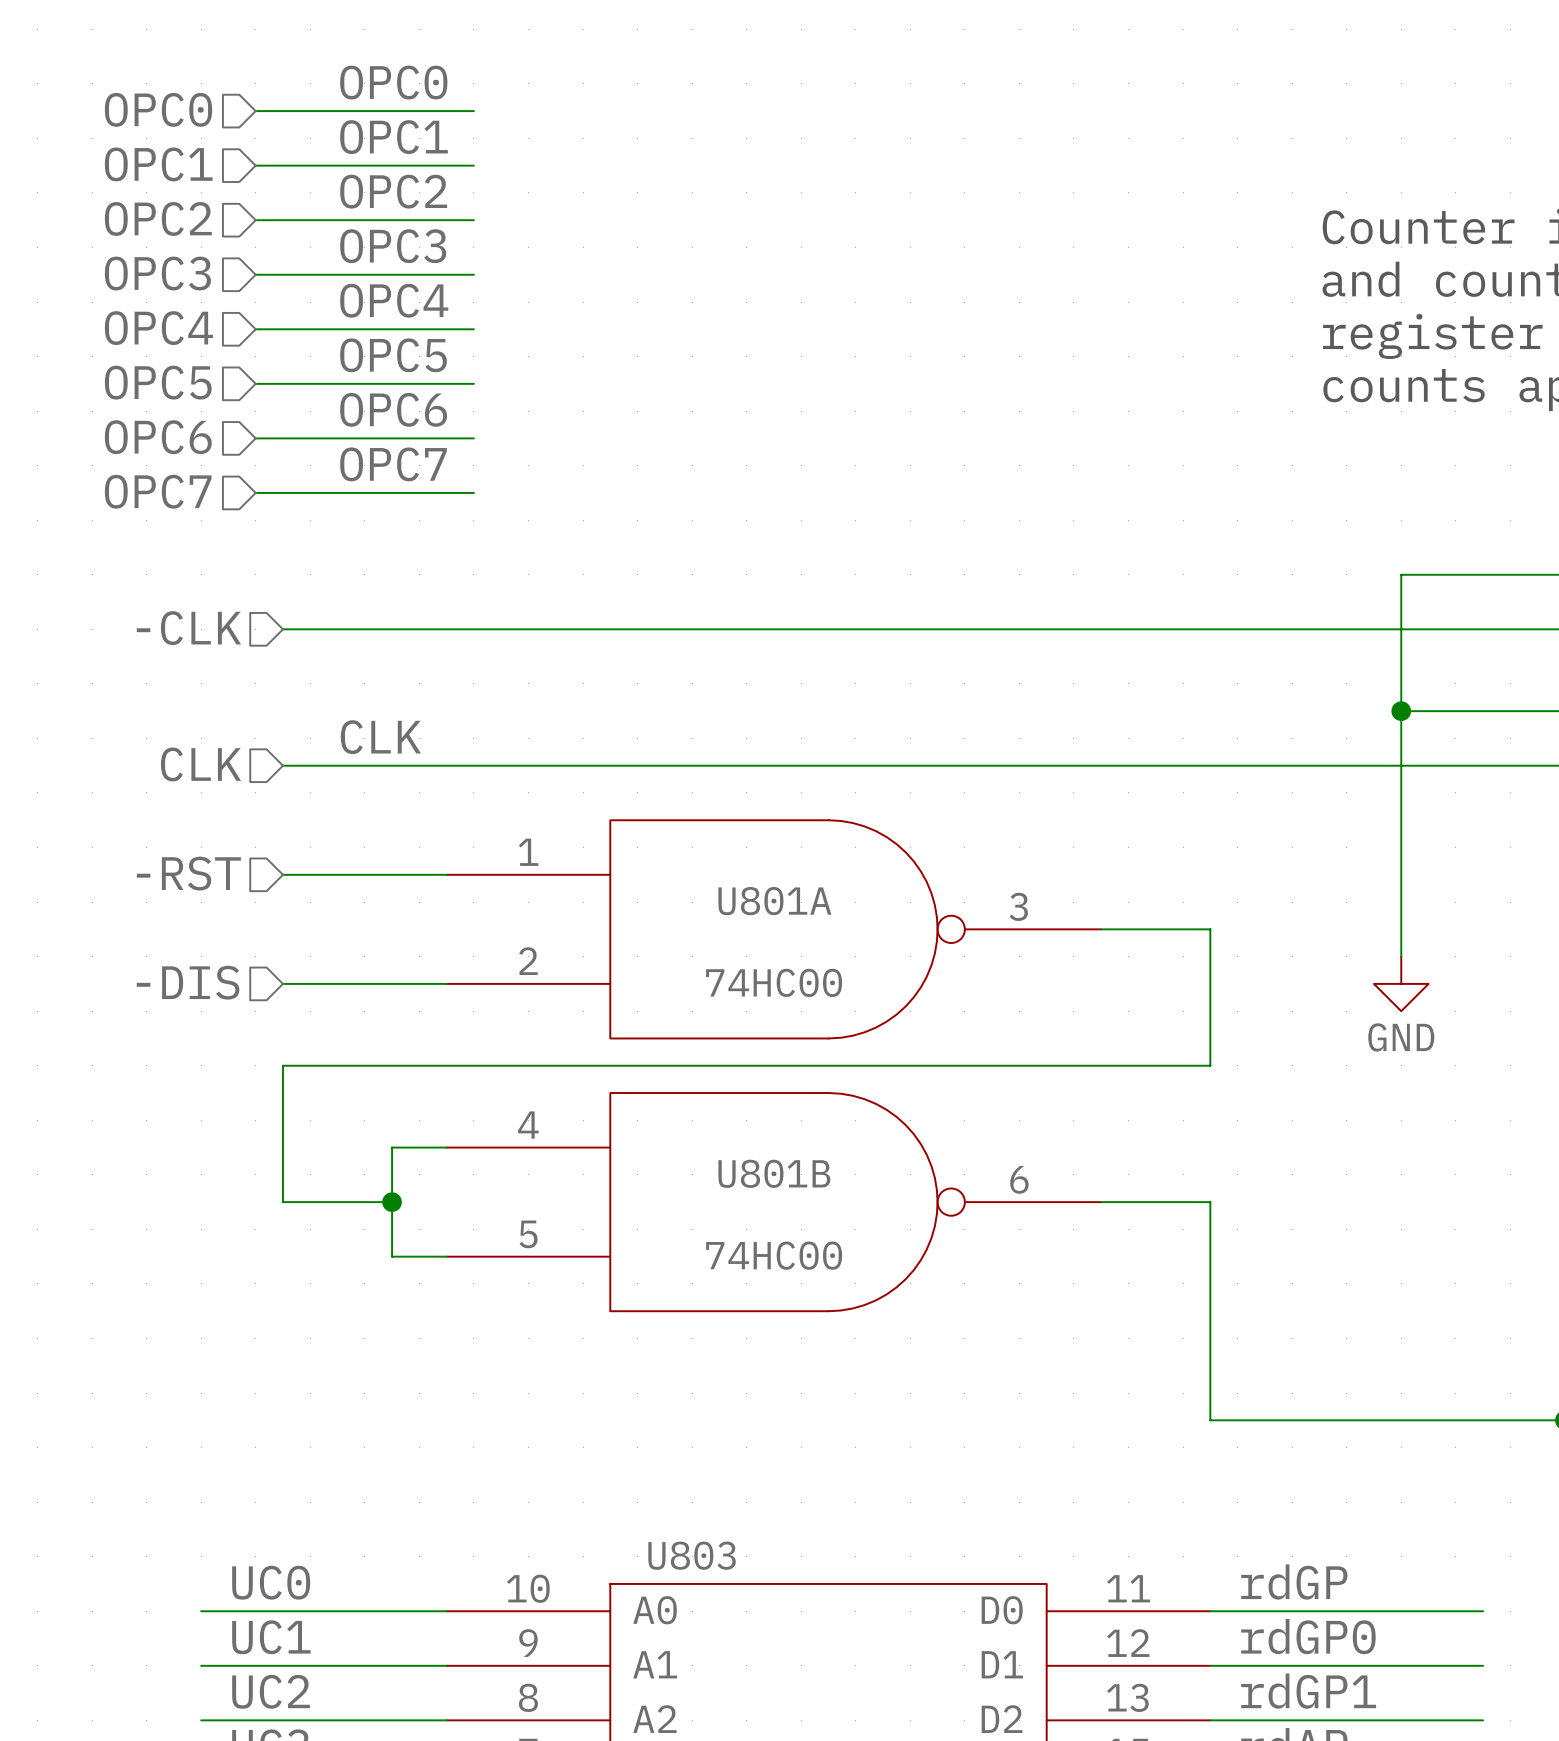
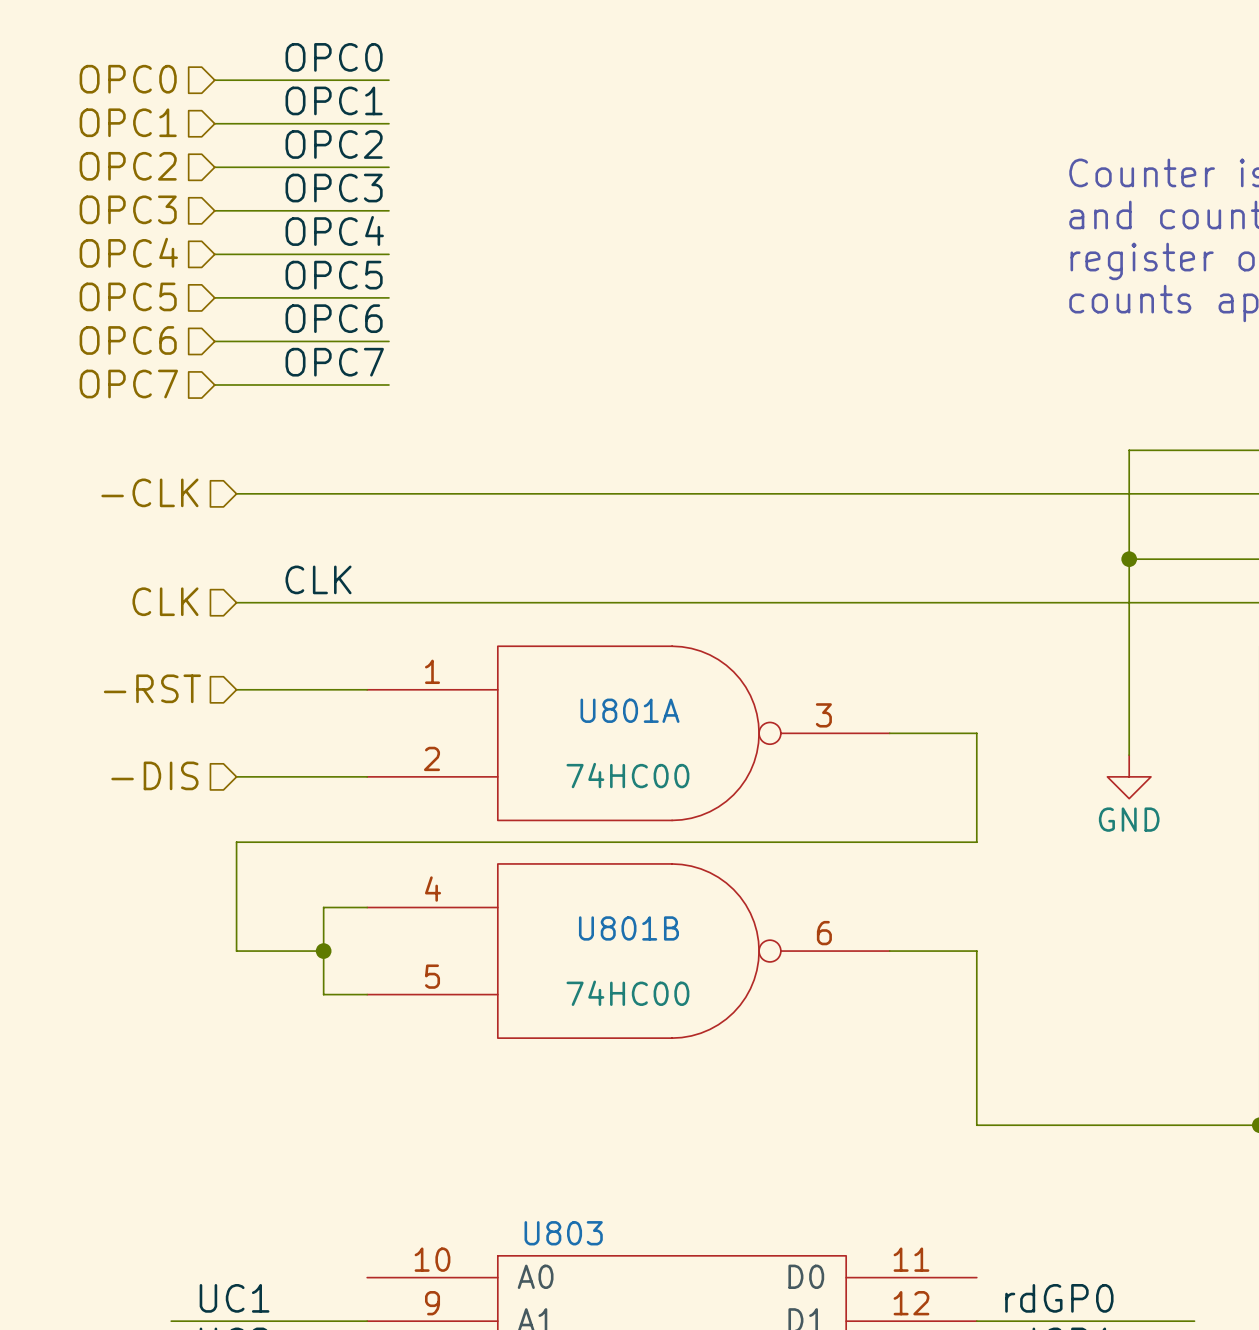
label: UC0 (271, 1582) -> none
label: rdGP (1294, 1582) -> none
wire: (201, 1611) (446, 1611) -> none
wire: (1210, 1611) (1483, 1611) -> none

